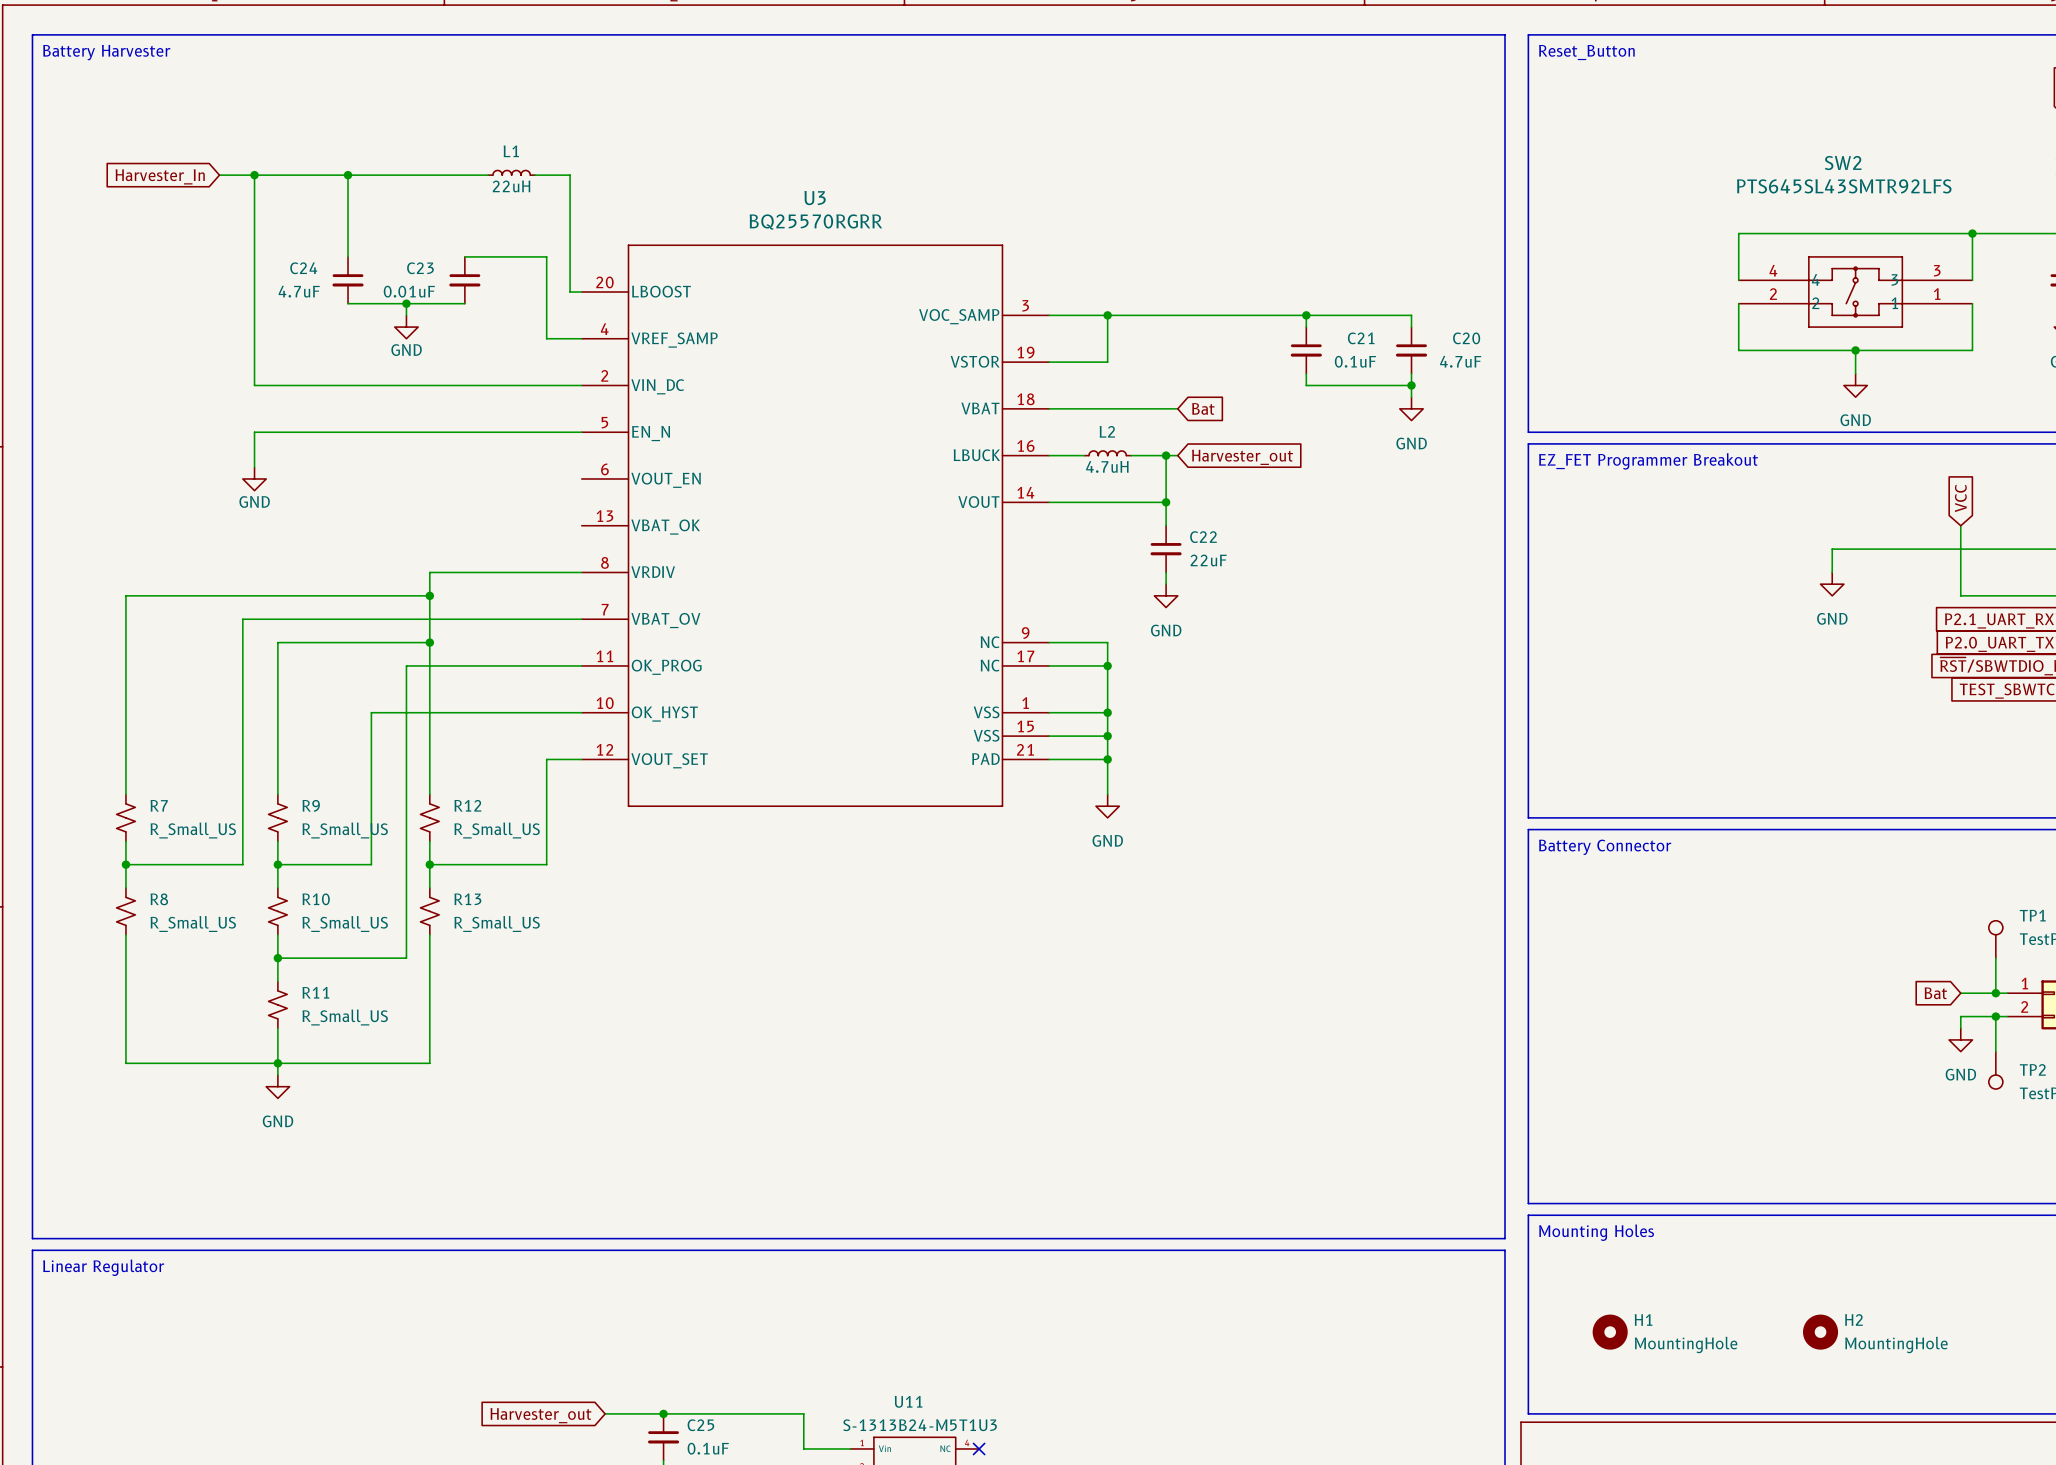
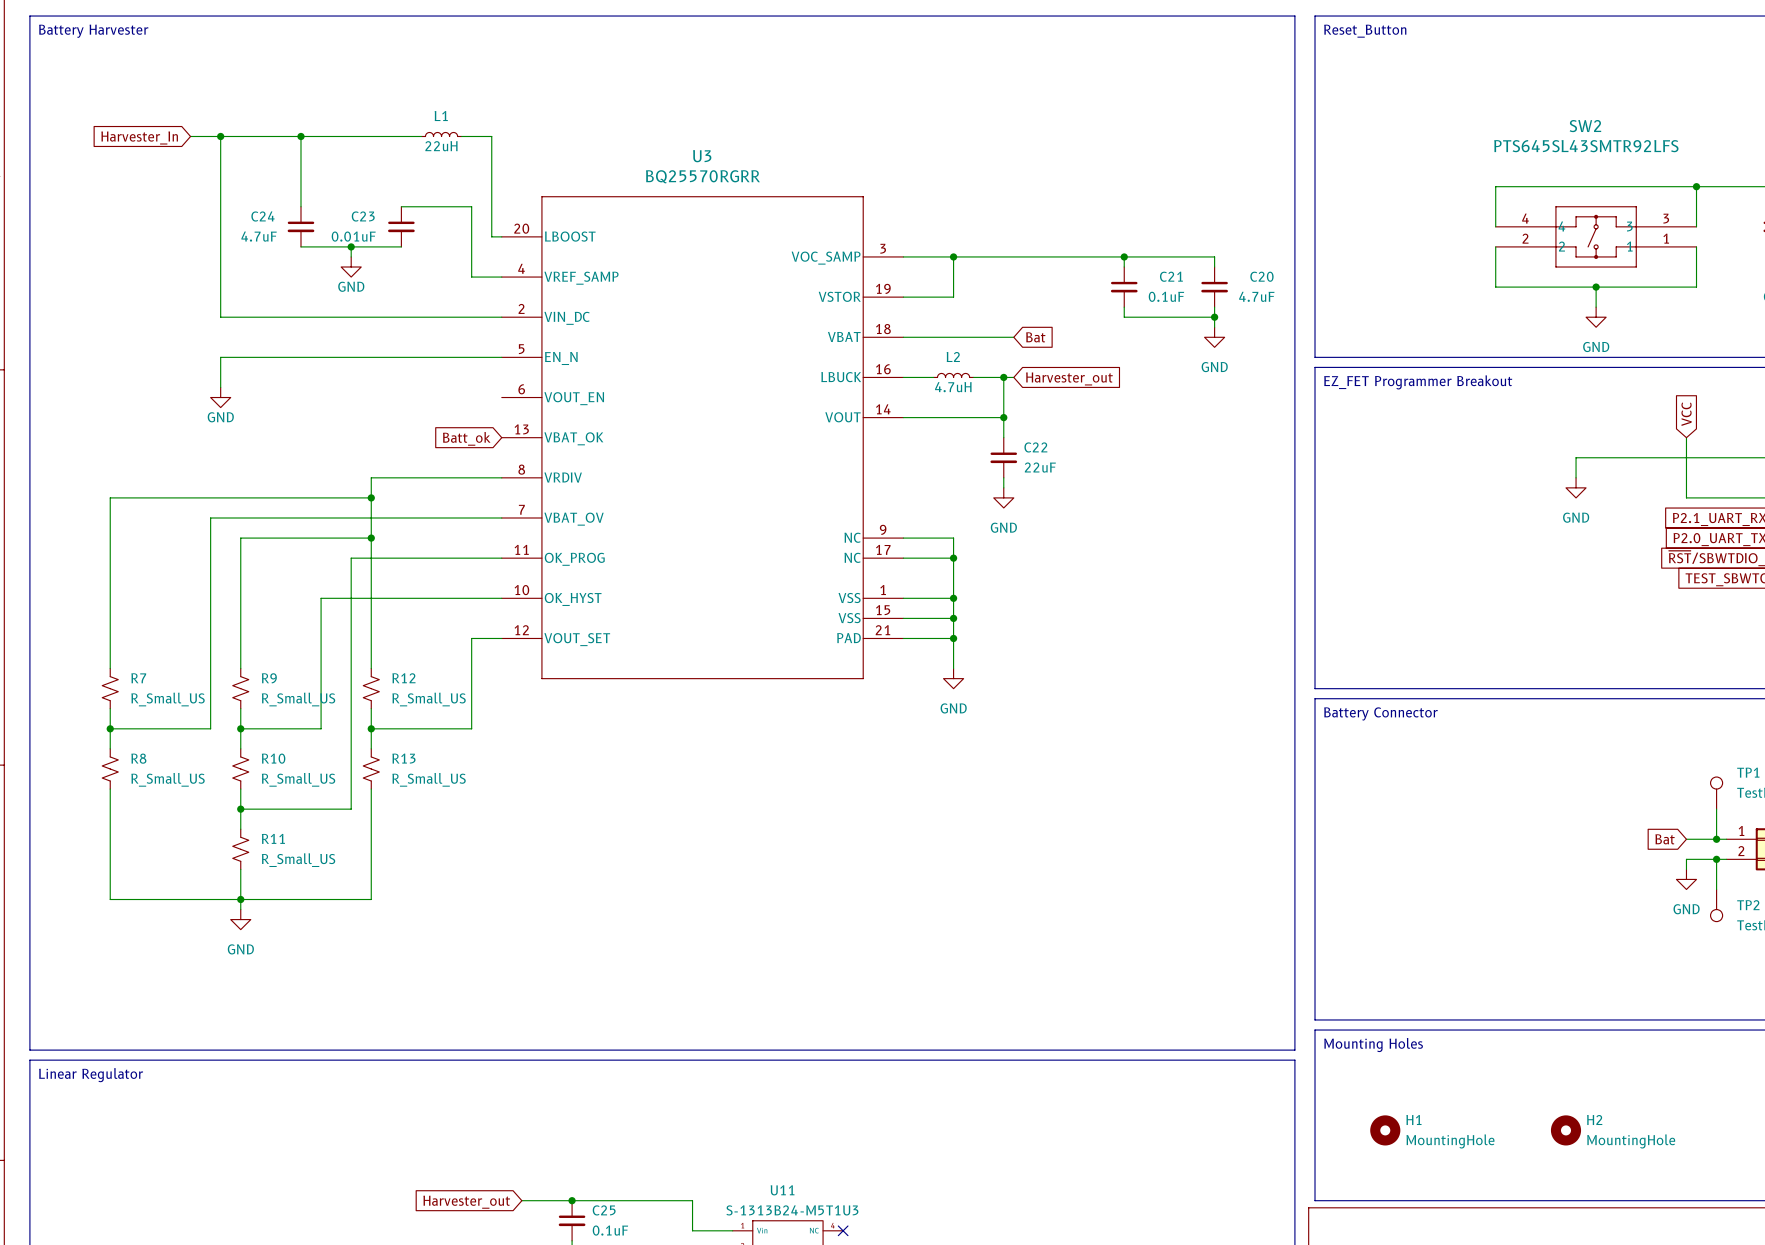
global label: none -> Batt_ok (466, 438)

